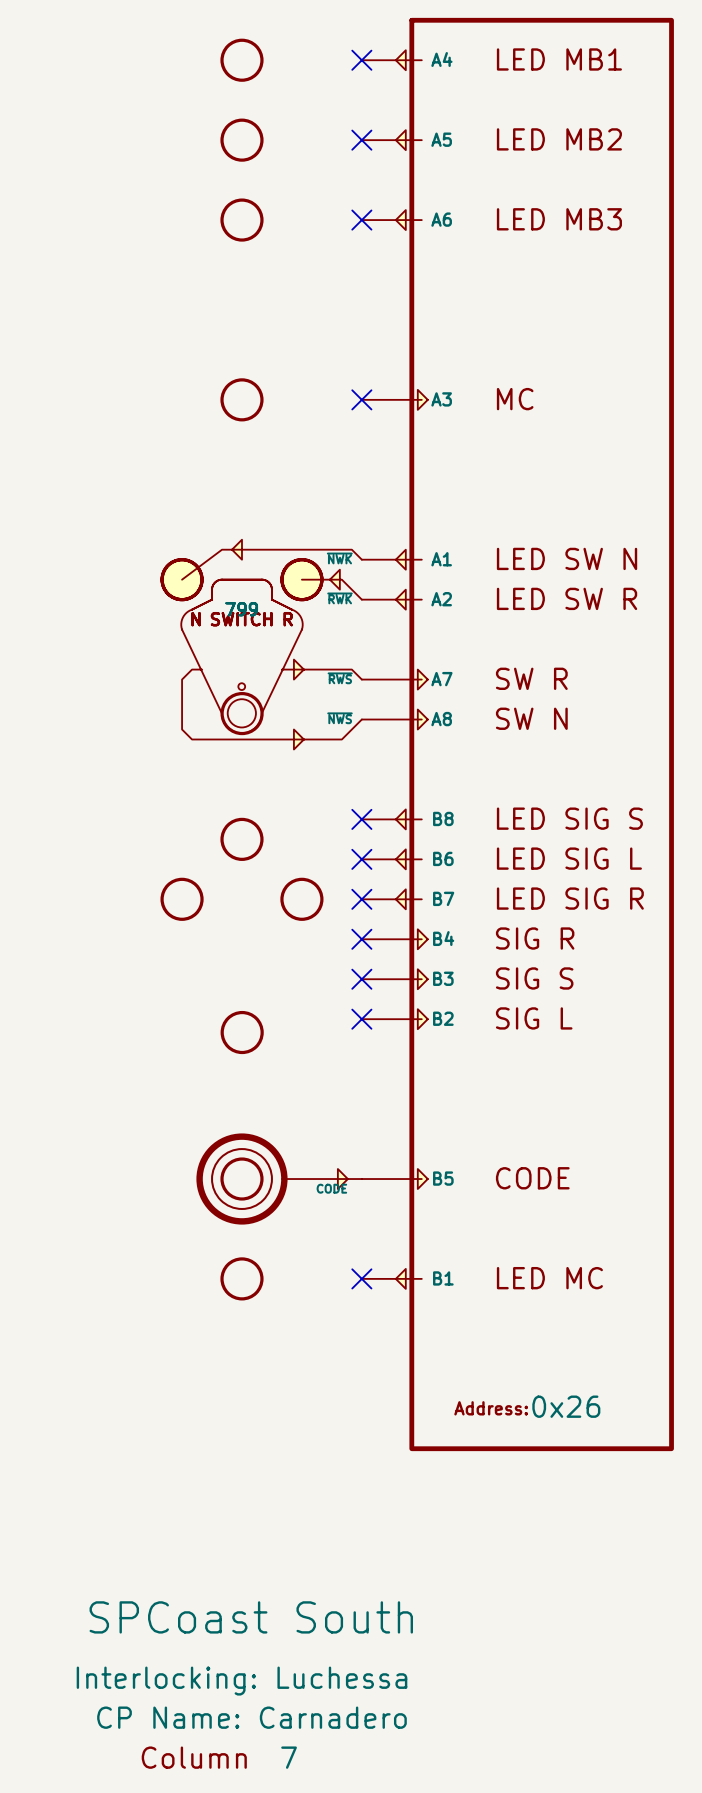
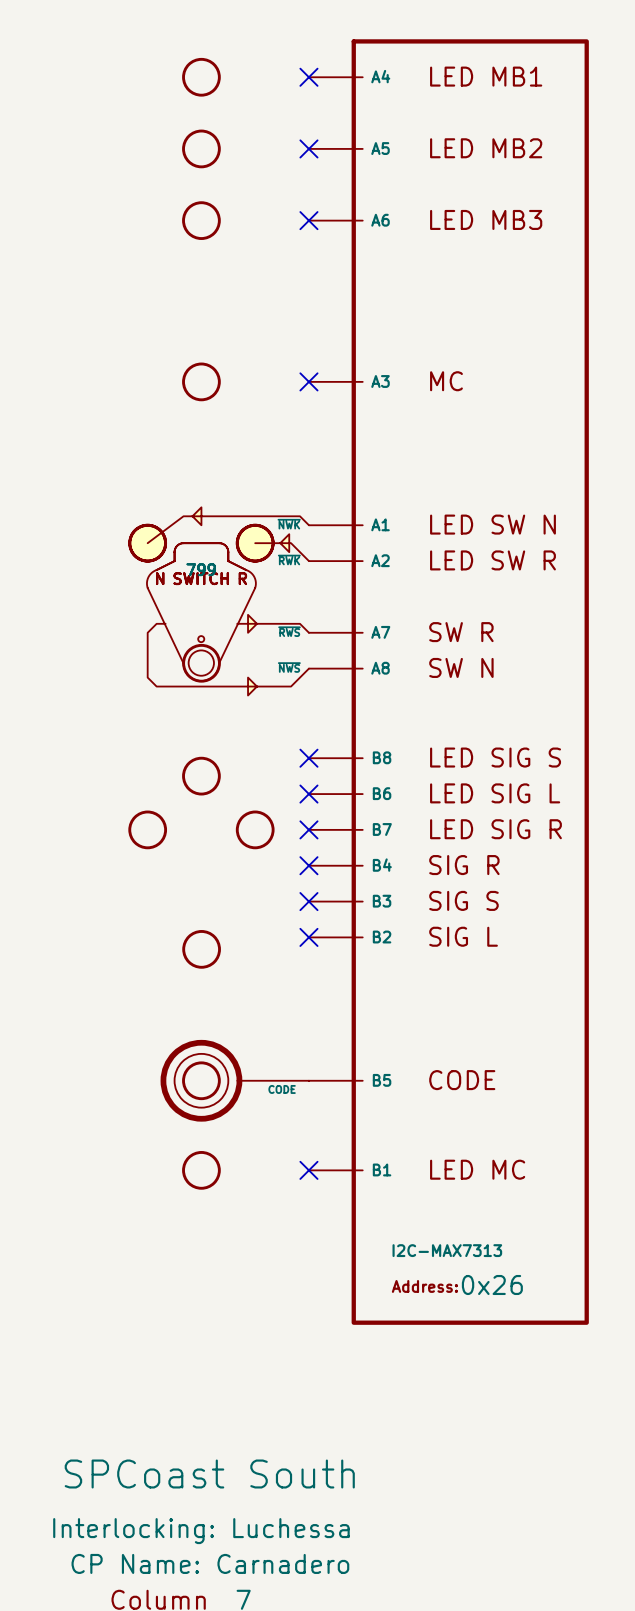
part symbol: [361, 17, 674, 1452] -> [308, 39, 589, 1325]
part symbol: [196, 1133, 362, 1225] -> [160, 1039, 309, 1122]
part text: none -> I2C-MAX7313 (447, 1250)

